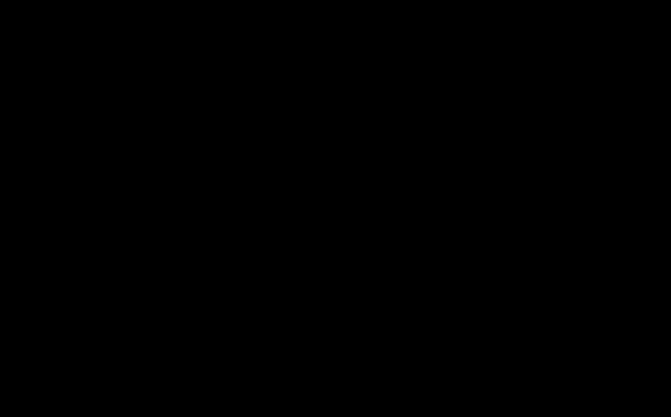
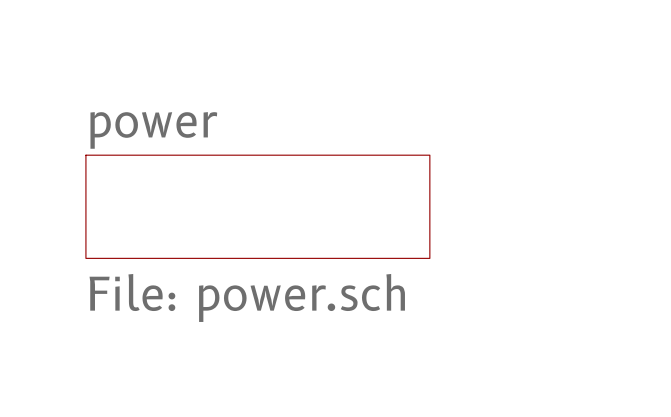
sheet power: none -> File: power.sch (257, 206)

